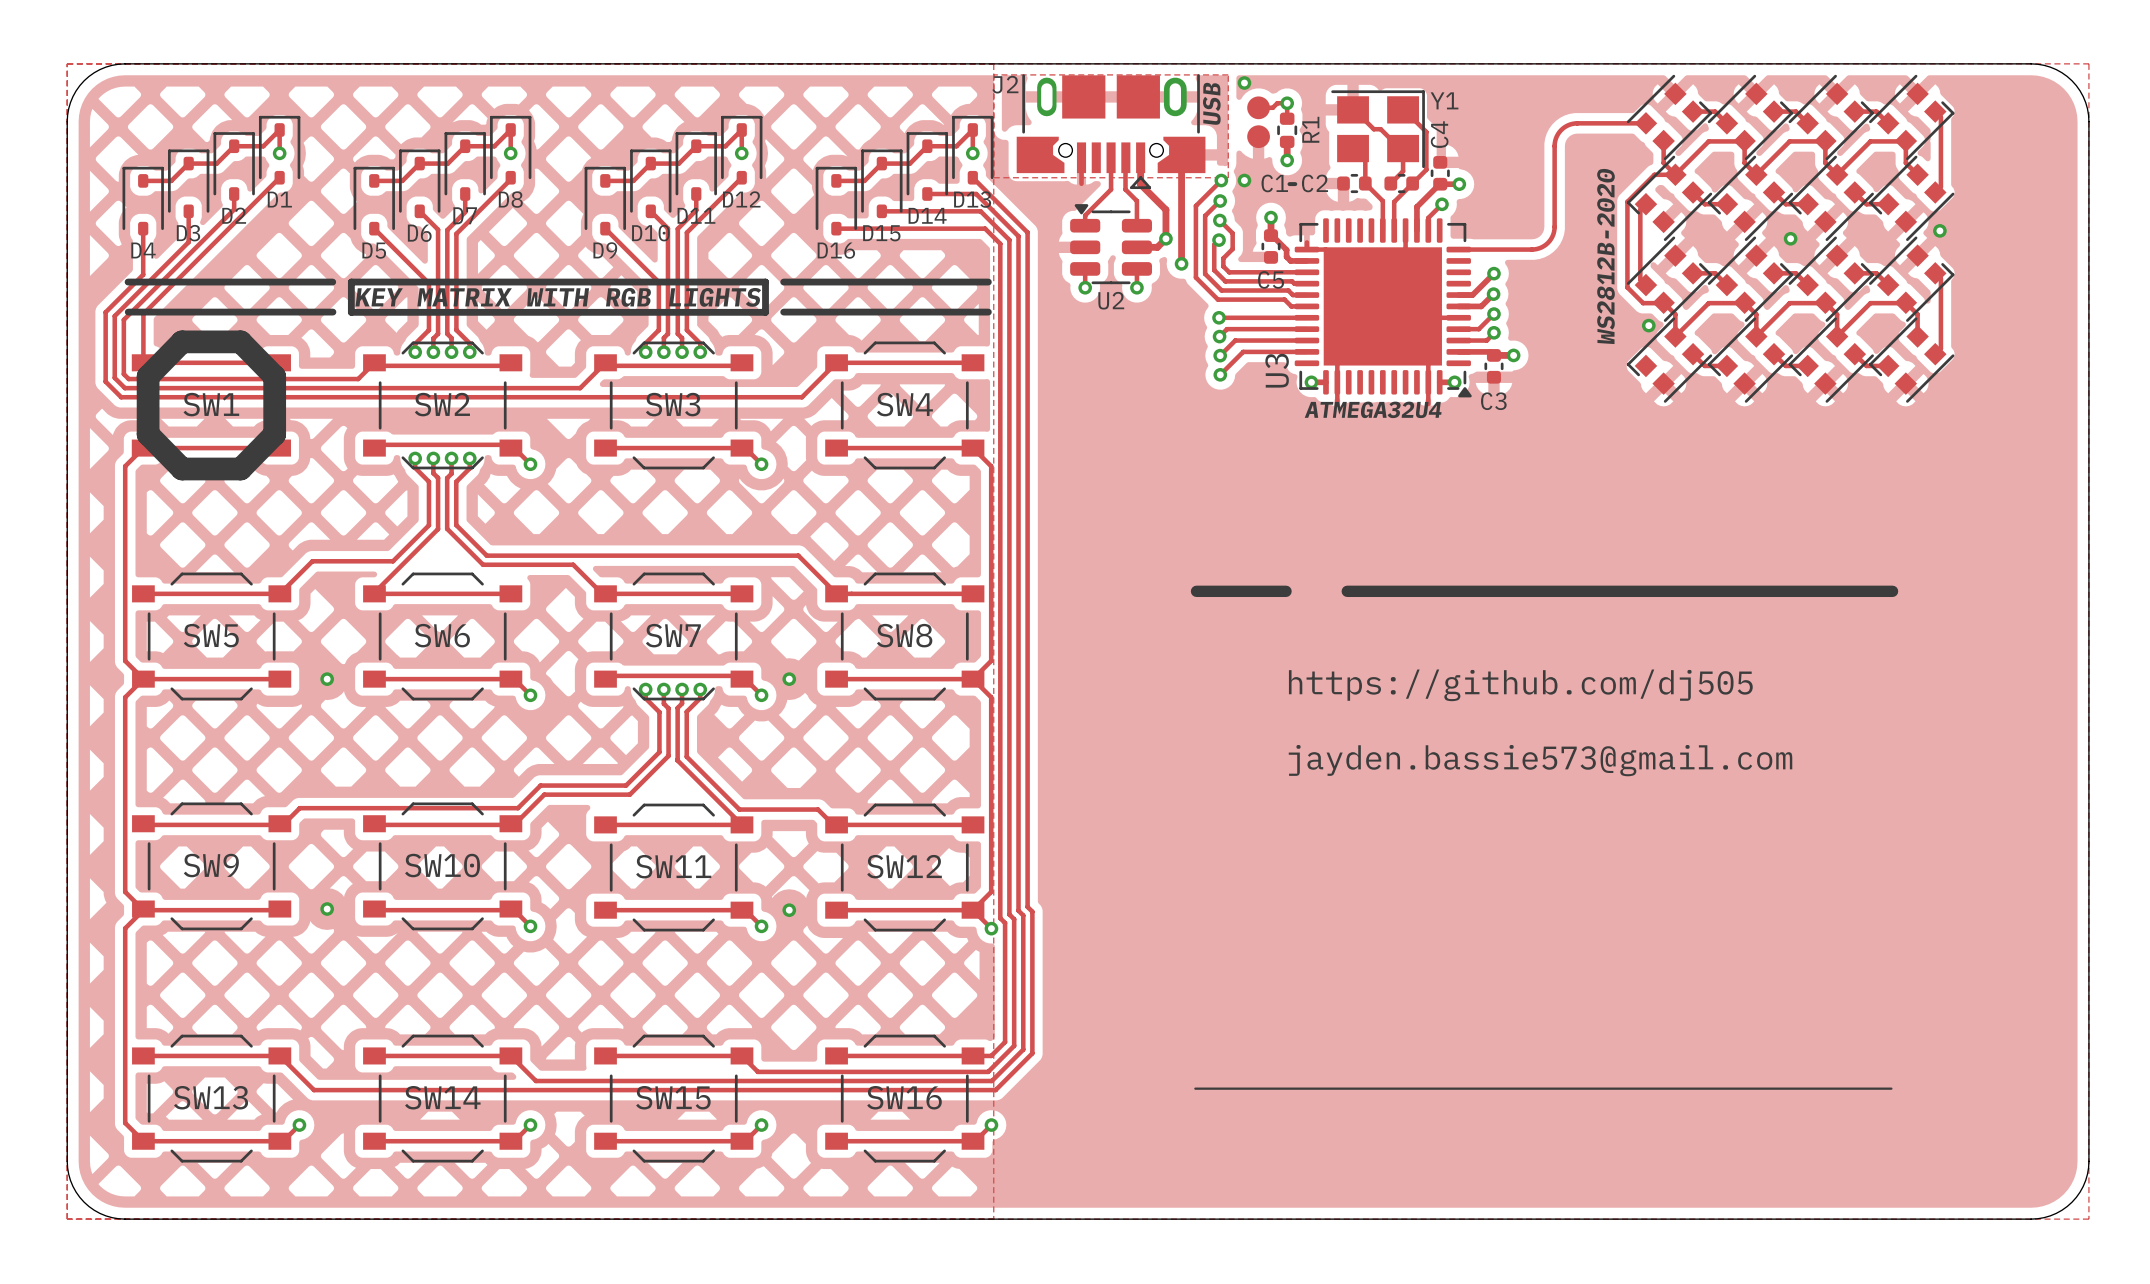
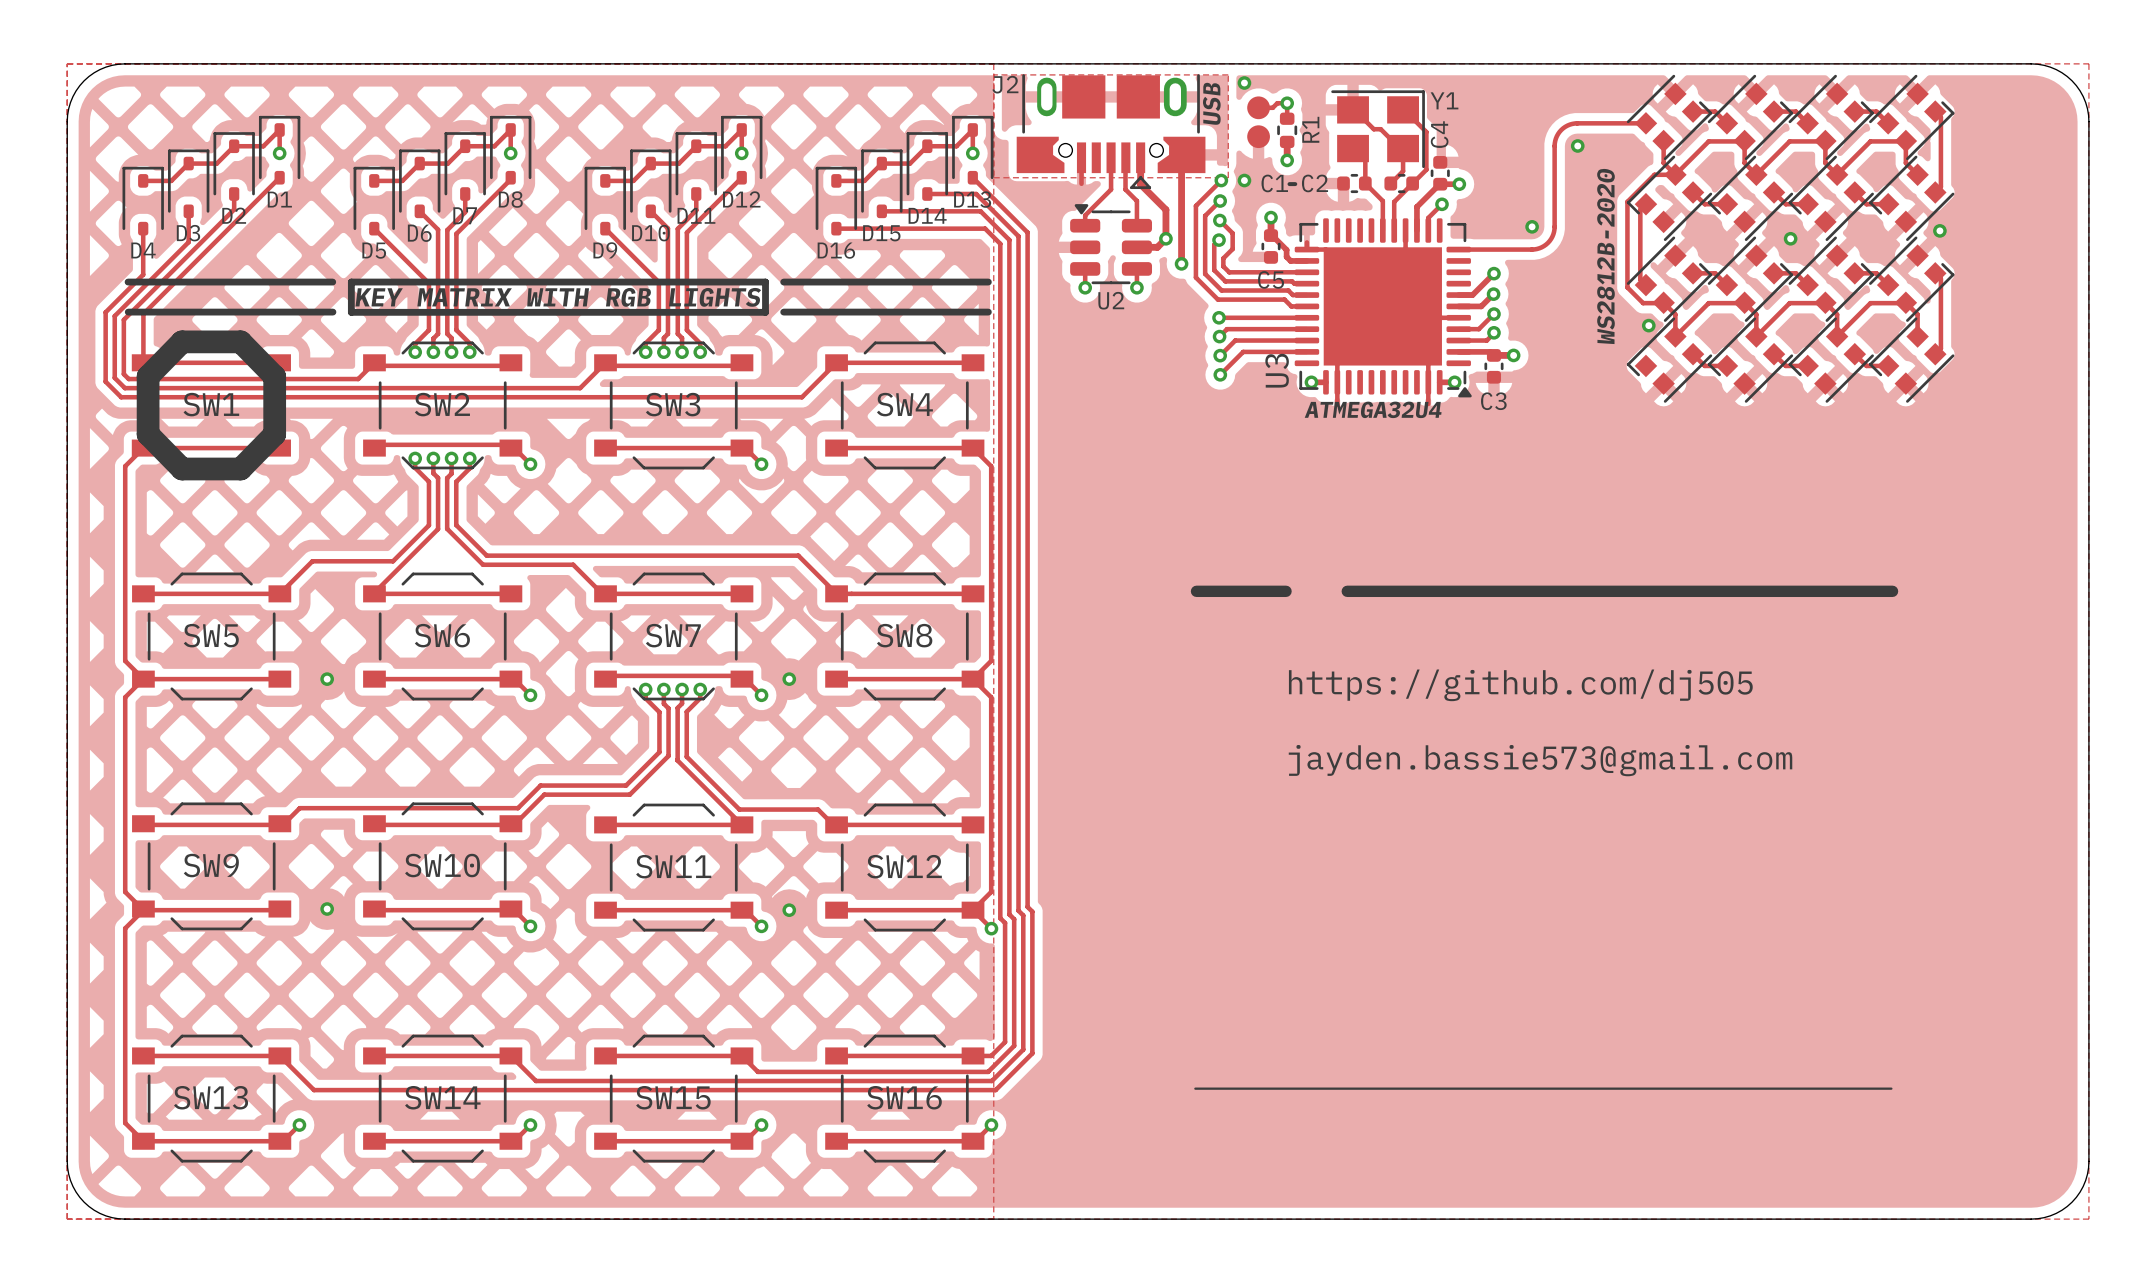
via: none -> (1577, 145)
via: none -> (1532, 226)

